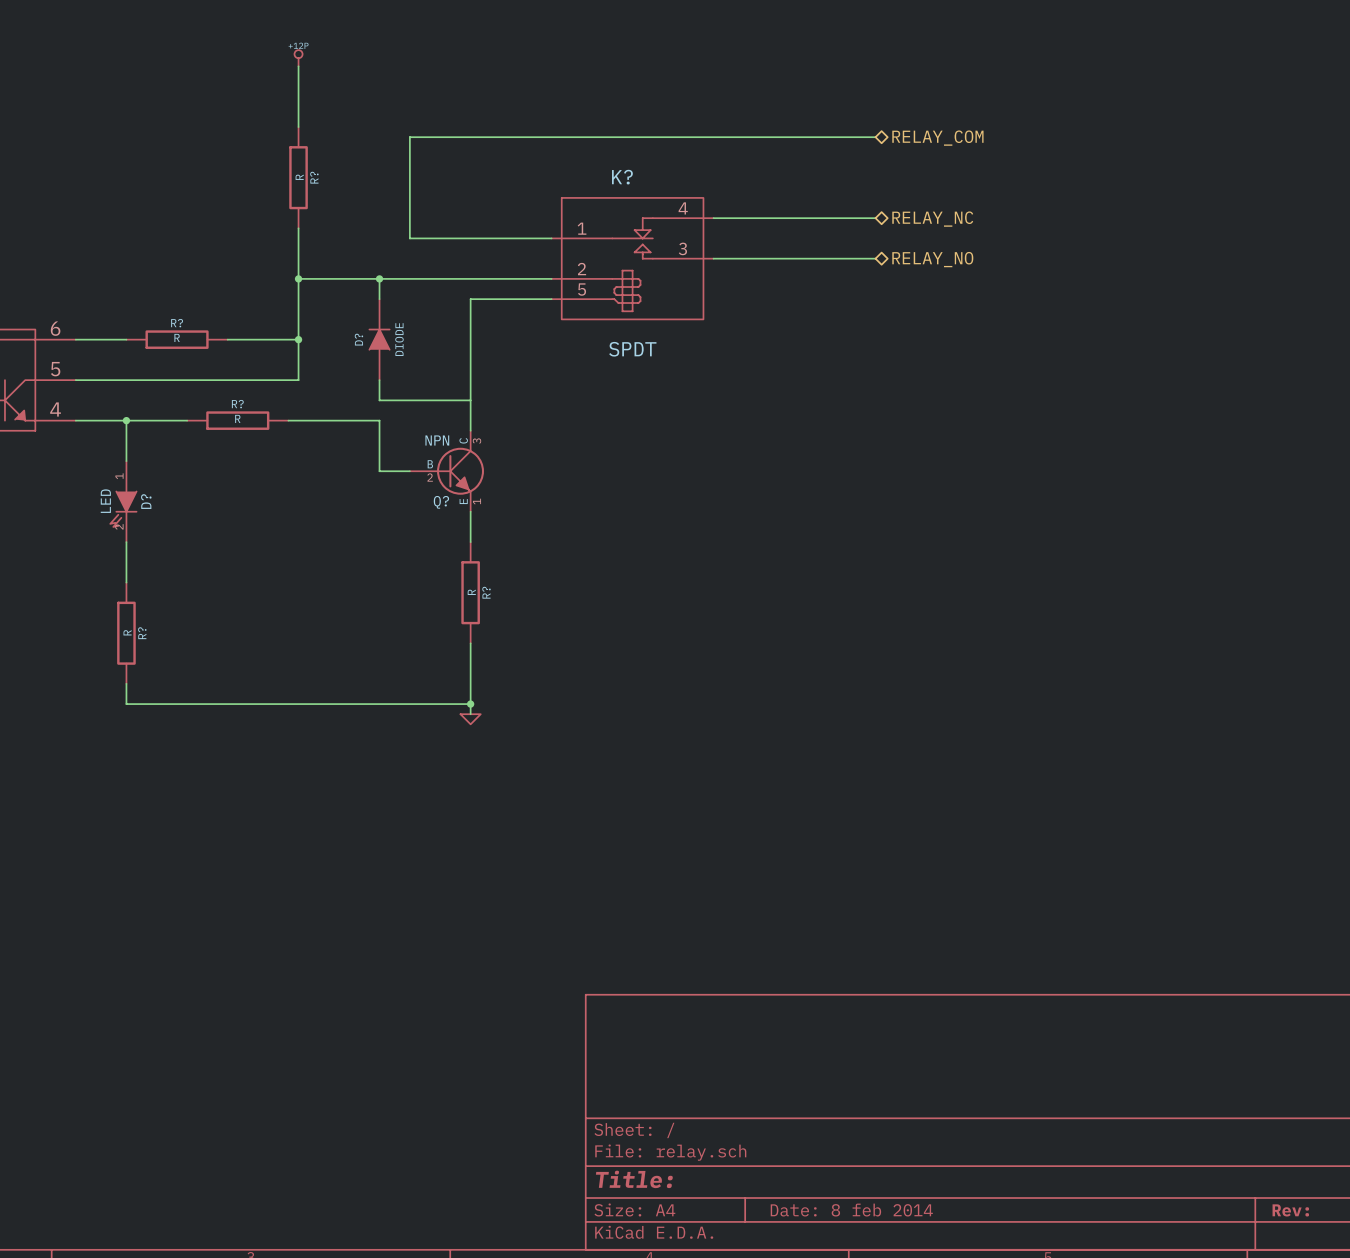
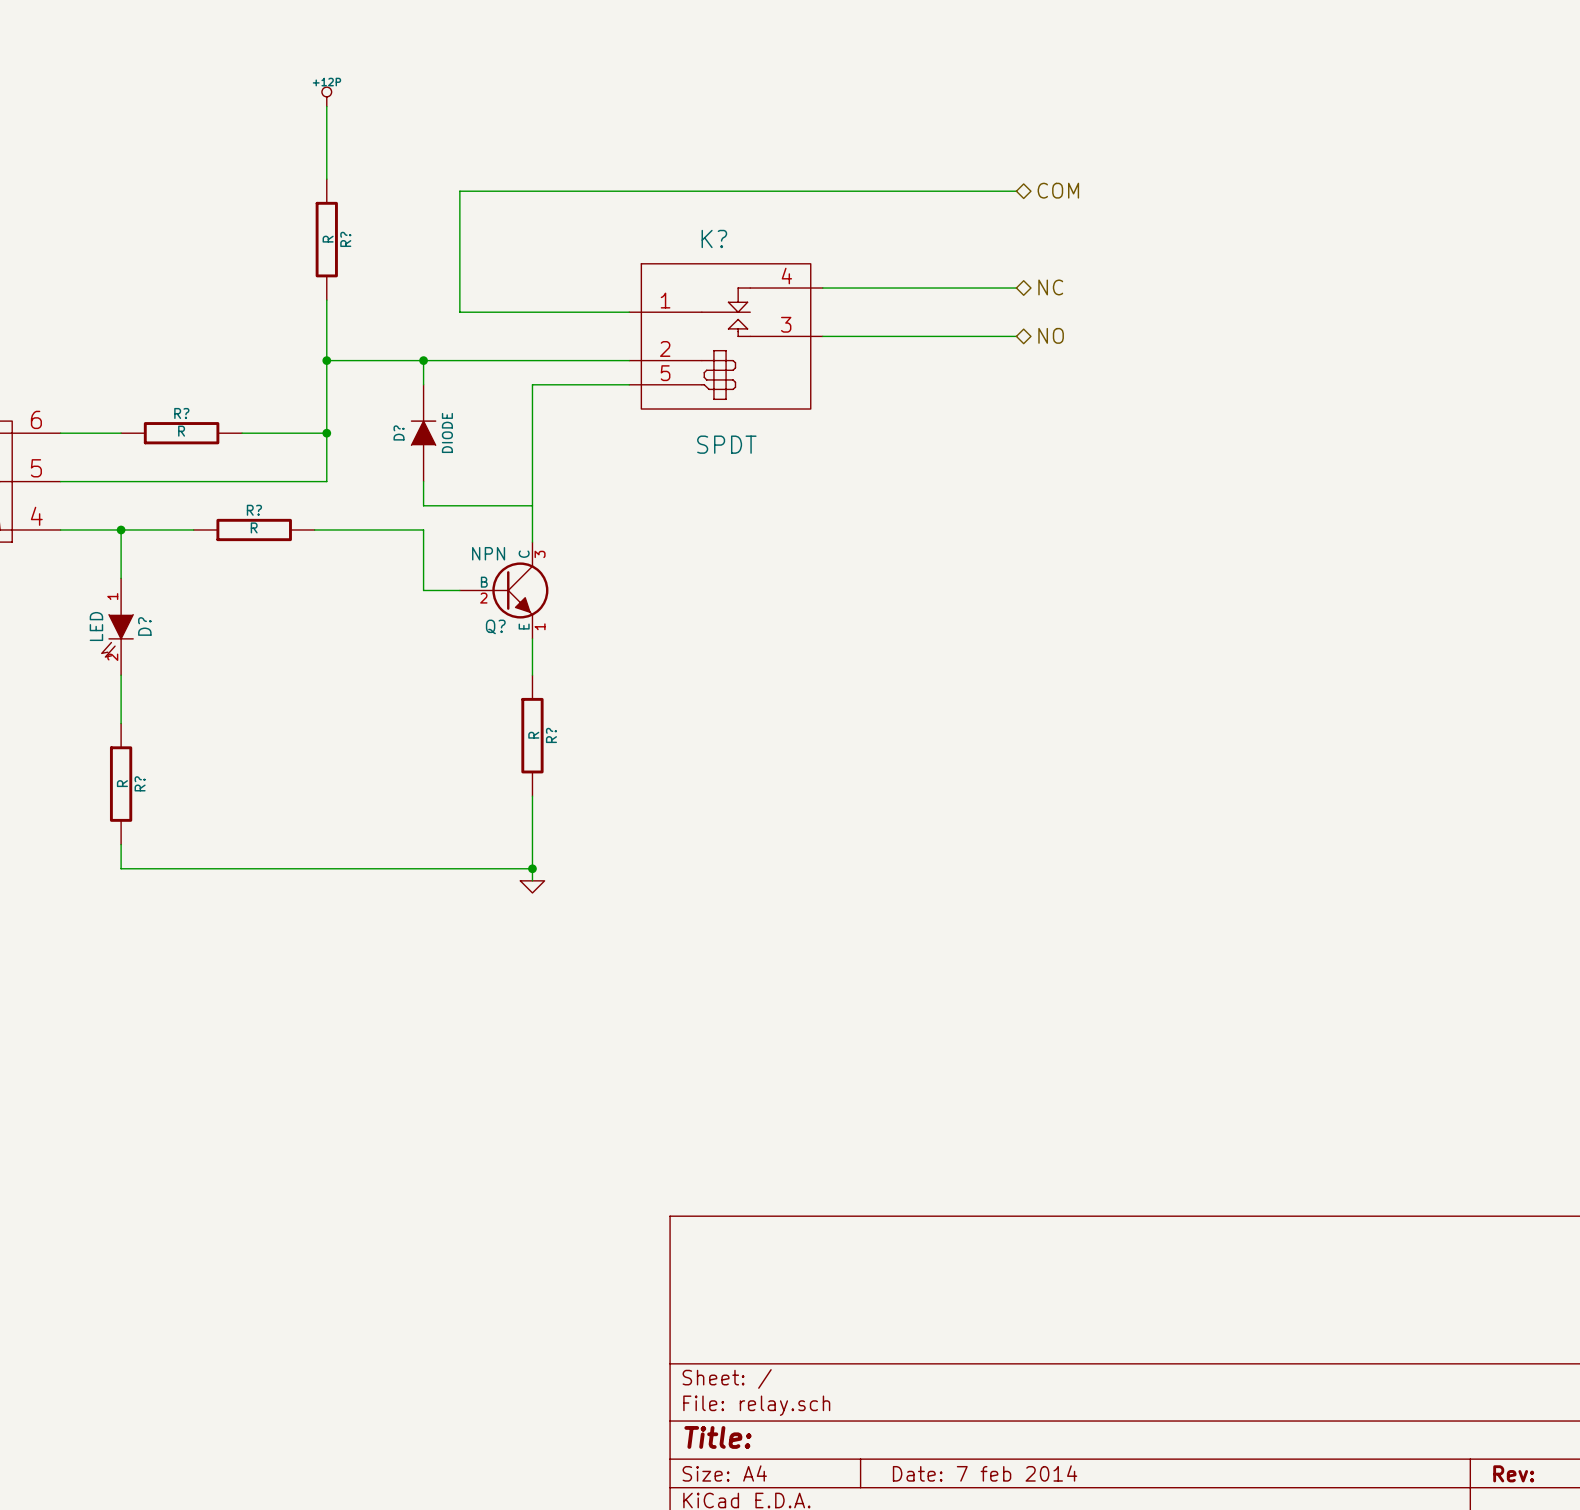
hierarchical label: RELAY_COM (937, 138) -> COM (1058, 190)
hierarchical label: RELAY_NC (932, 219) -> NC (1050, 287)
hierarchical label: RELAY_NO (932, 259) -> NO (1051, 335)
title block: Date: 8 feb 2014 (851, 1210) -> Date: 7 feb 2014 (985, 1473)

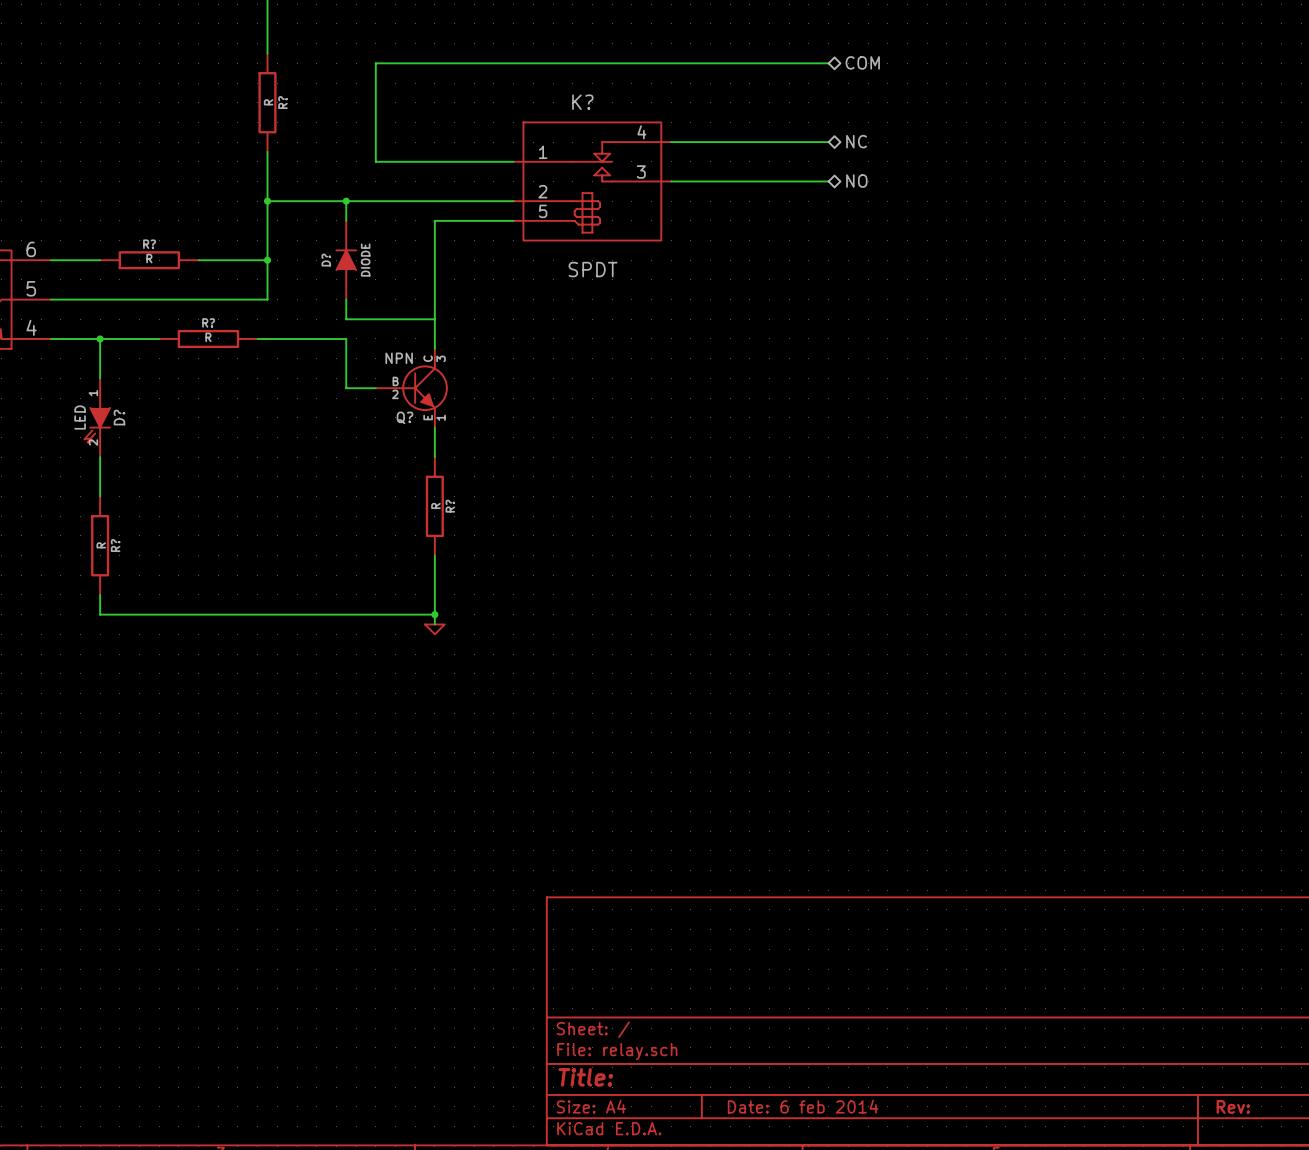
title block: Date: 7 feb 2014 (985, 1473) -> Date: 6 feb 2014 (803, 1106)

